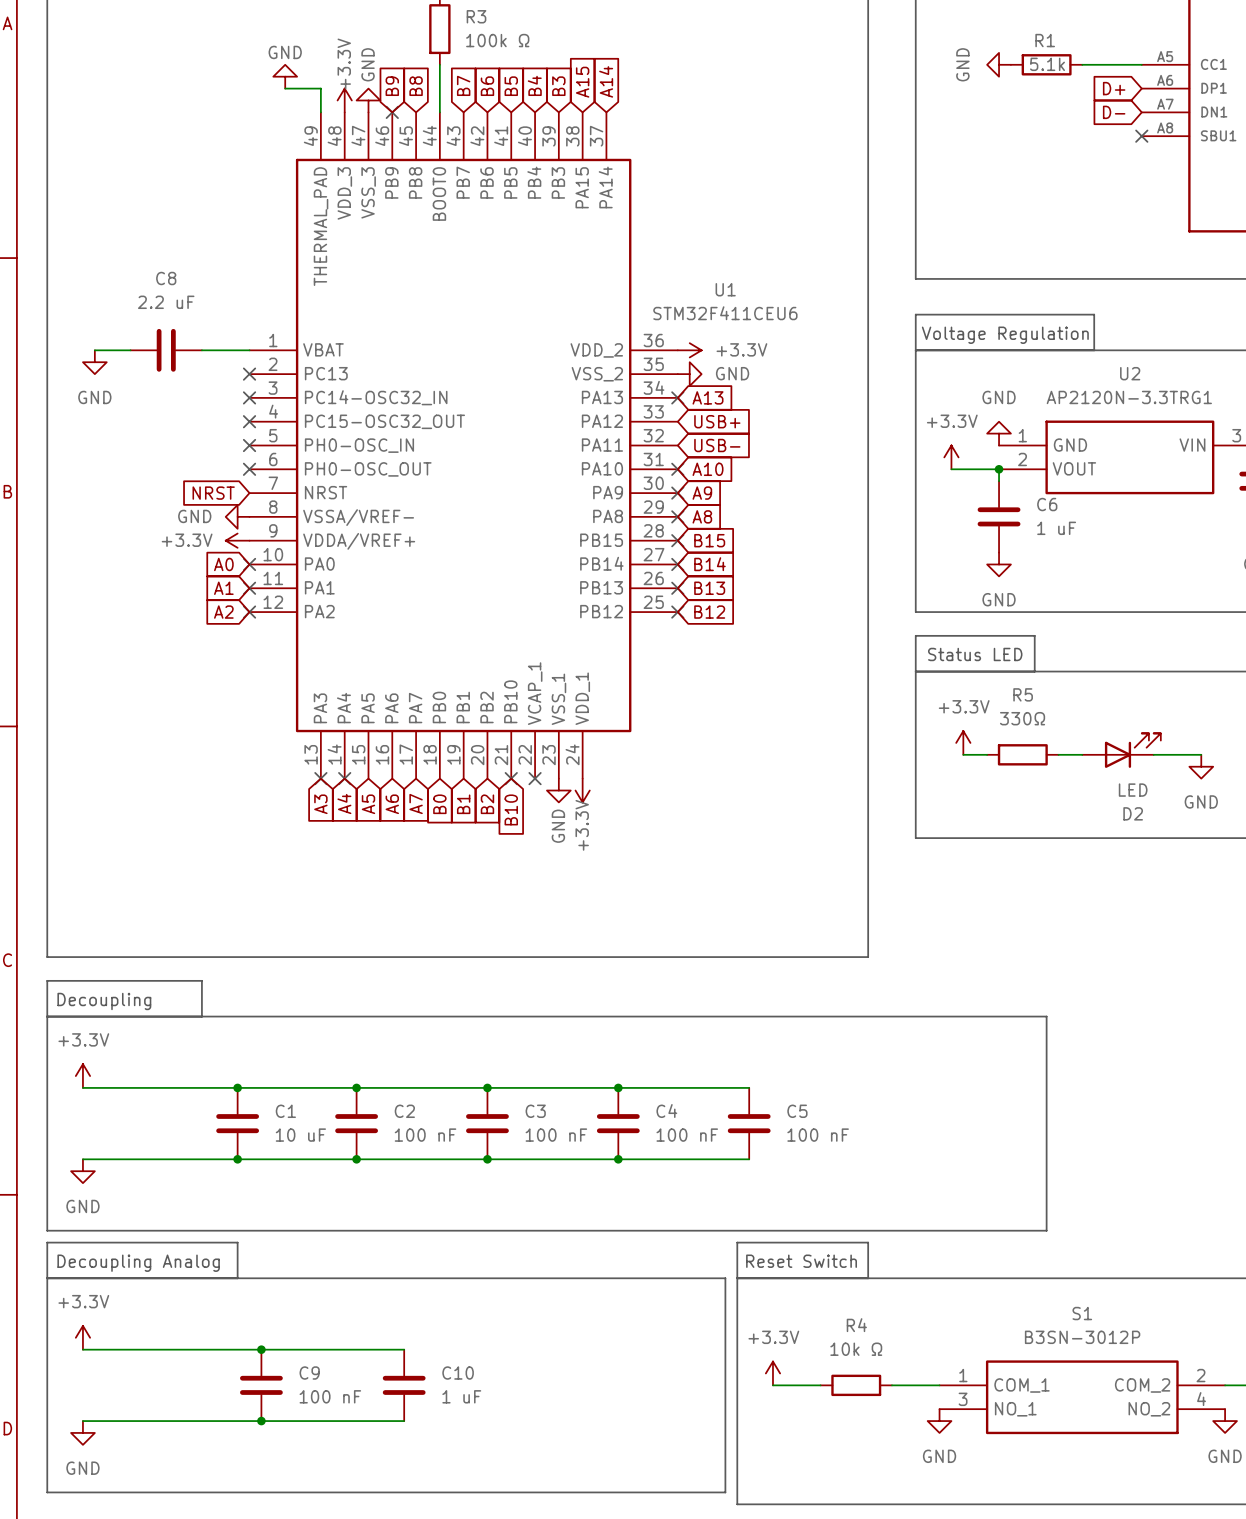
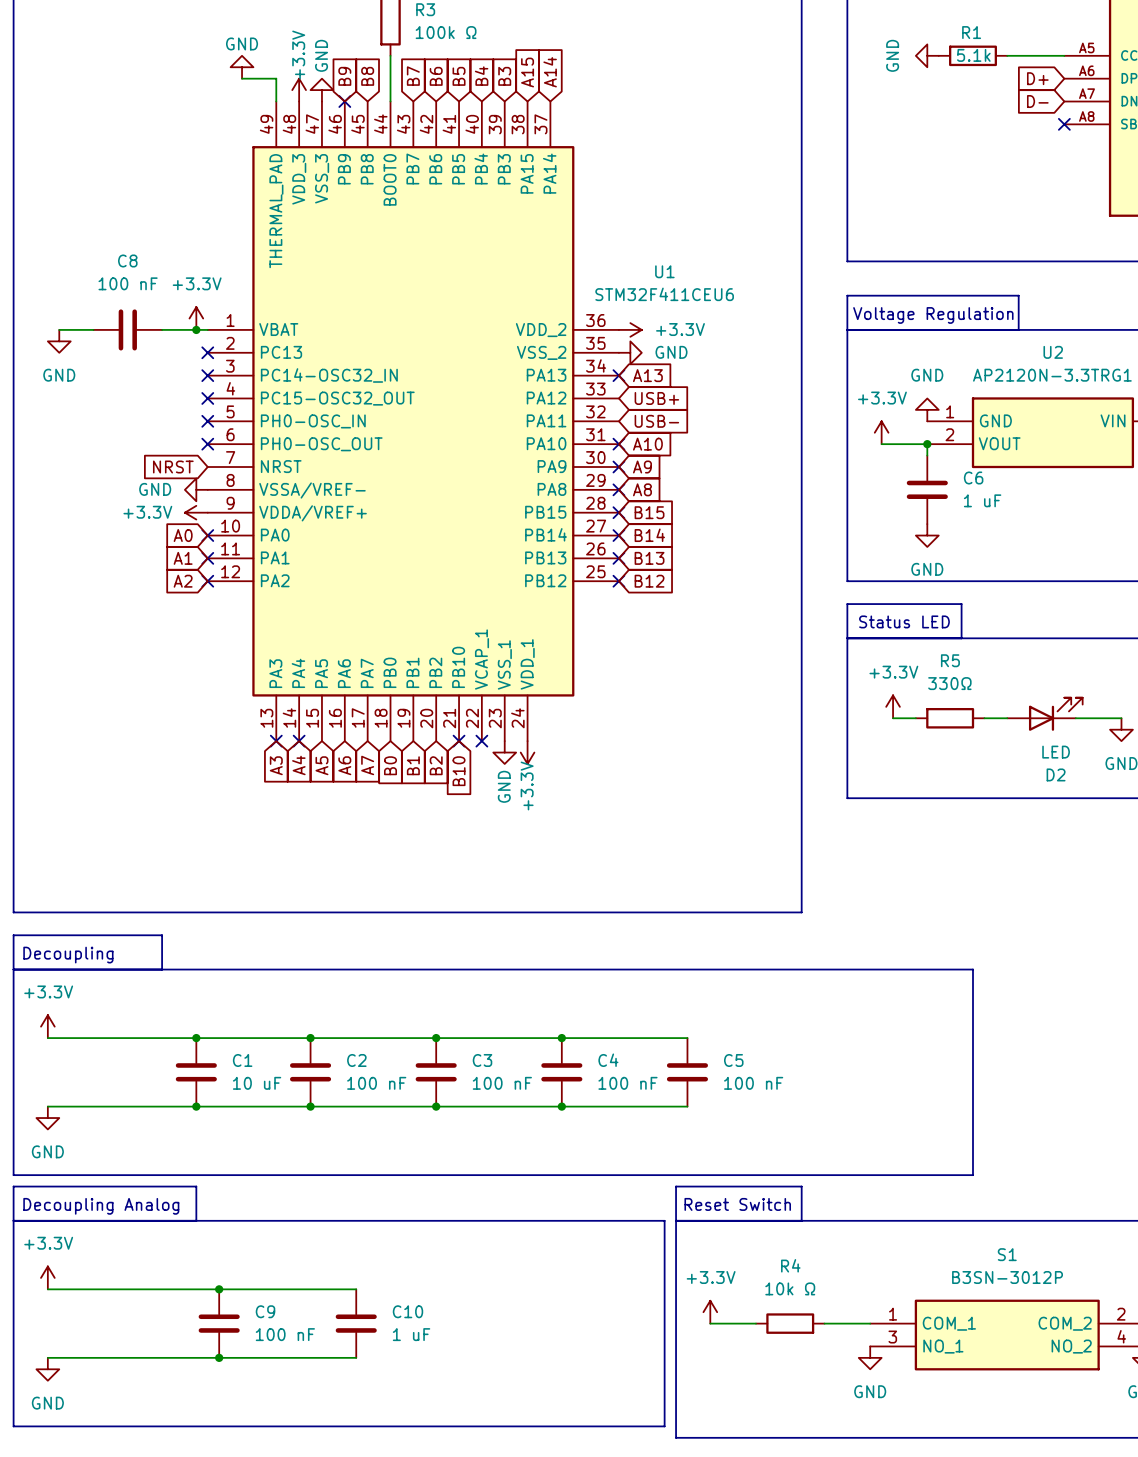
C8 value: 2.2 uF (166, 302) -> 100 nF (128, 283)
power symbol: none -> +3.3V (196, 318)
junction: none -> (196, 329)

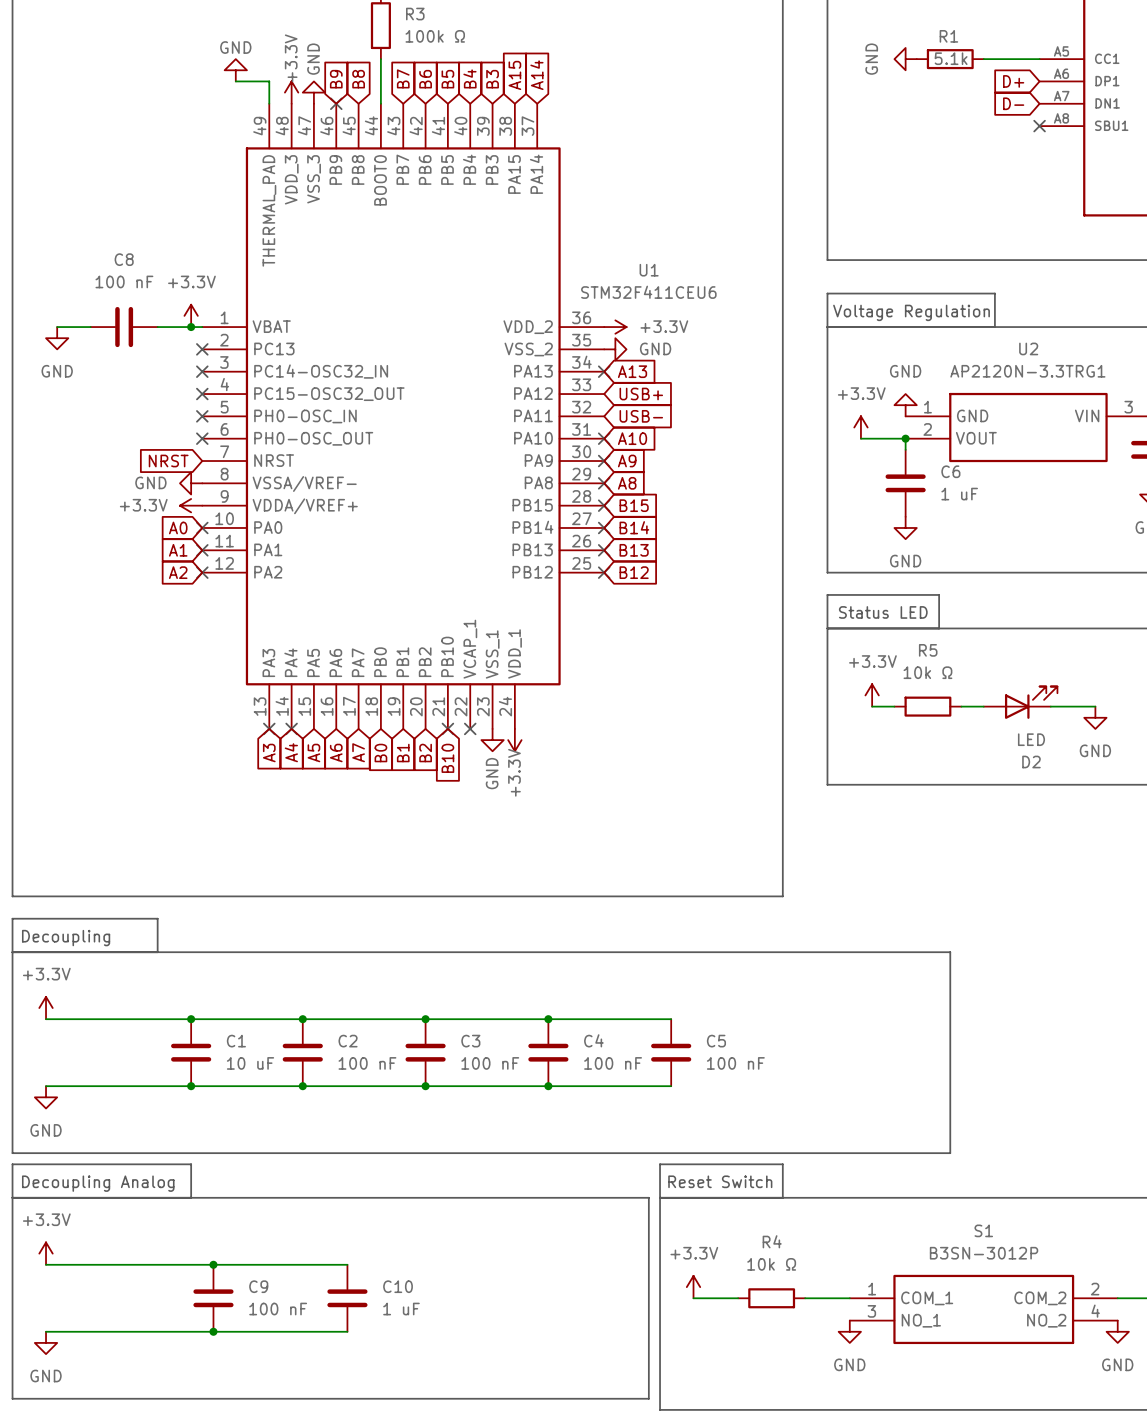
R5 value: 330Ω (949, 683) -> 10k Ω (927, 672)

